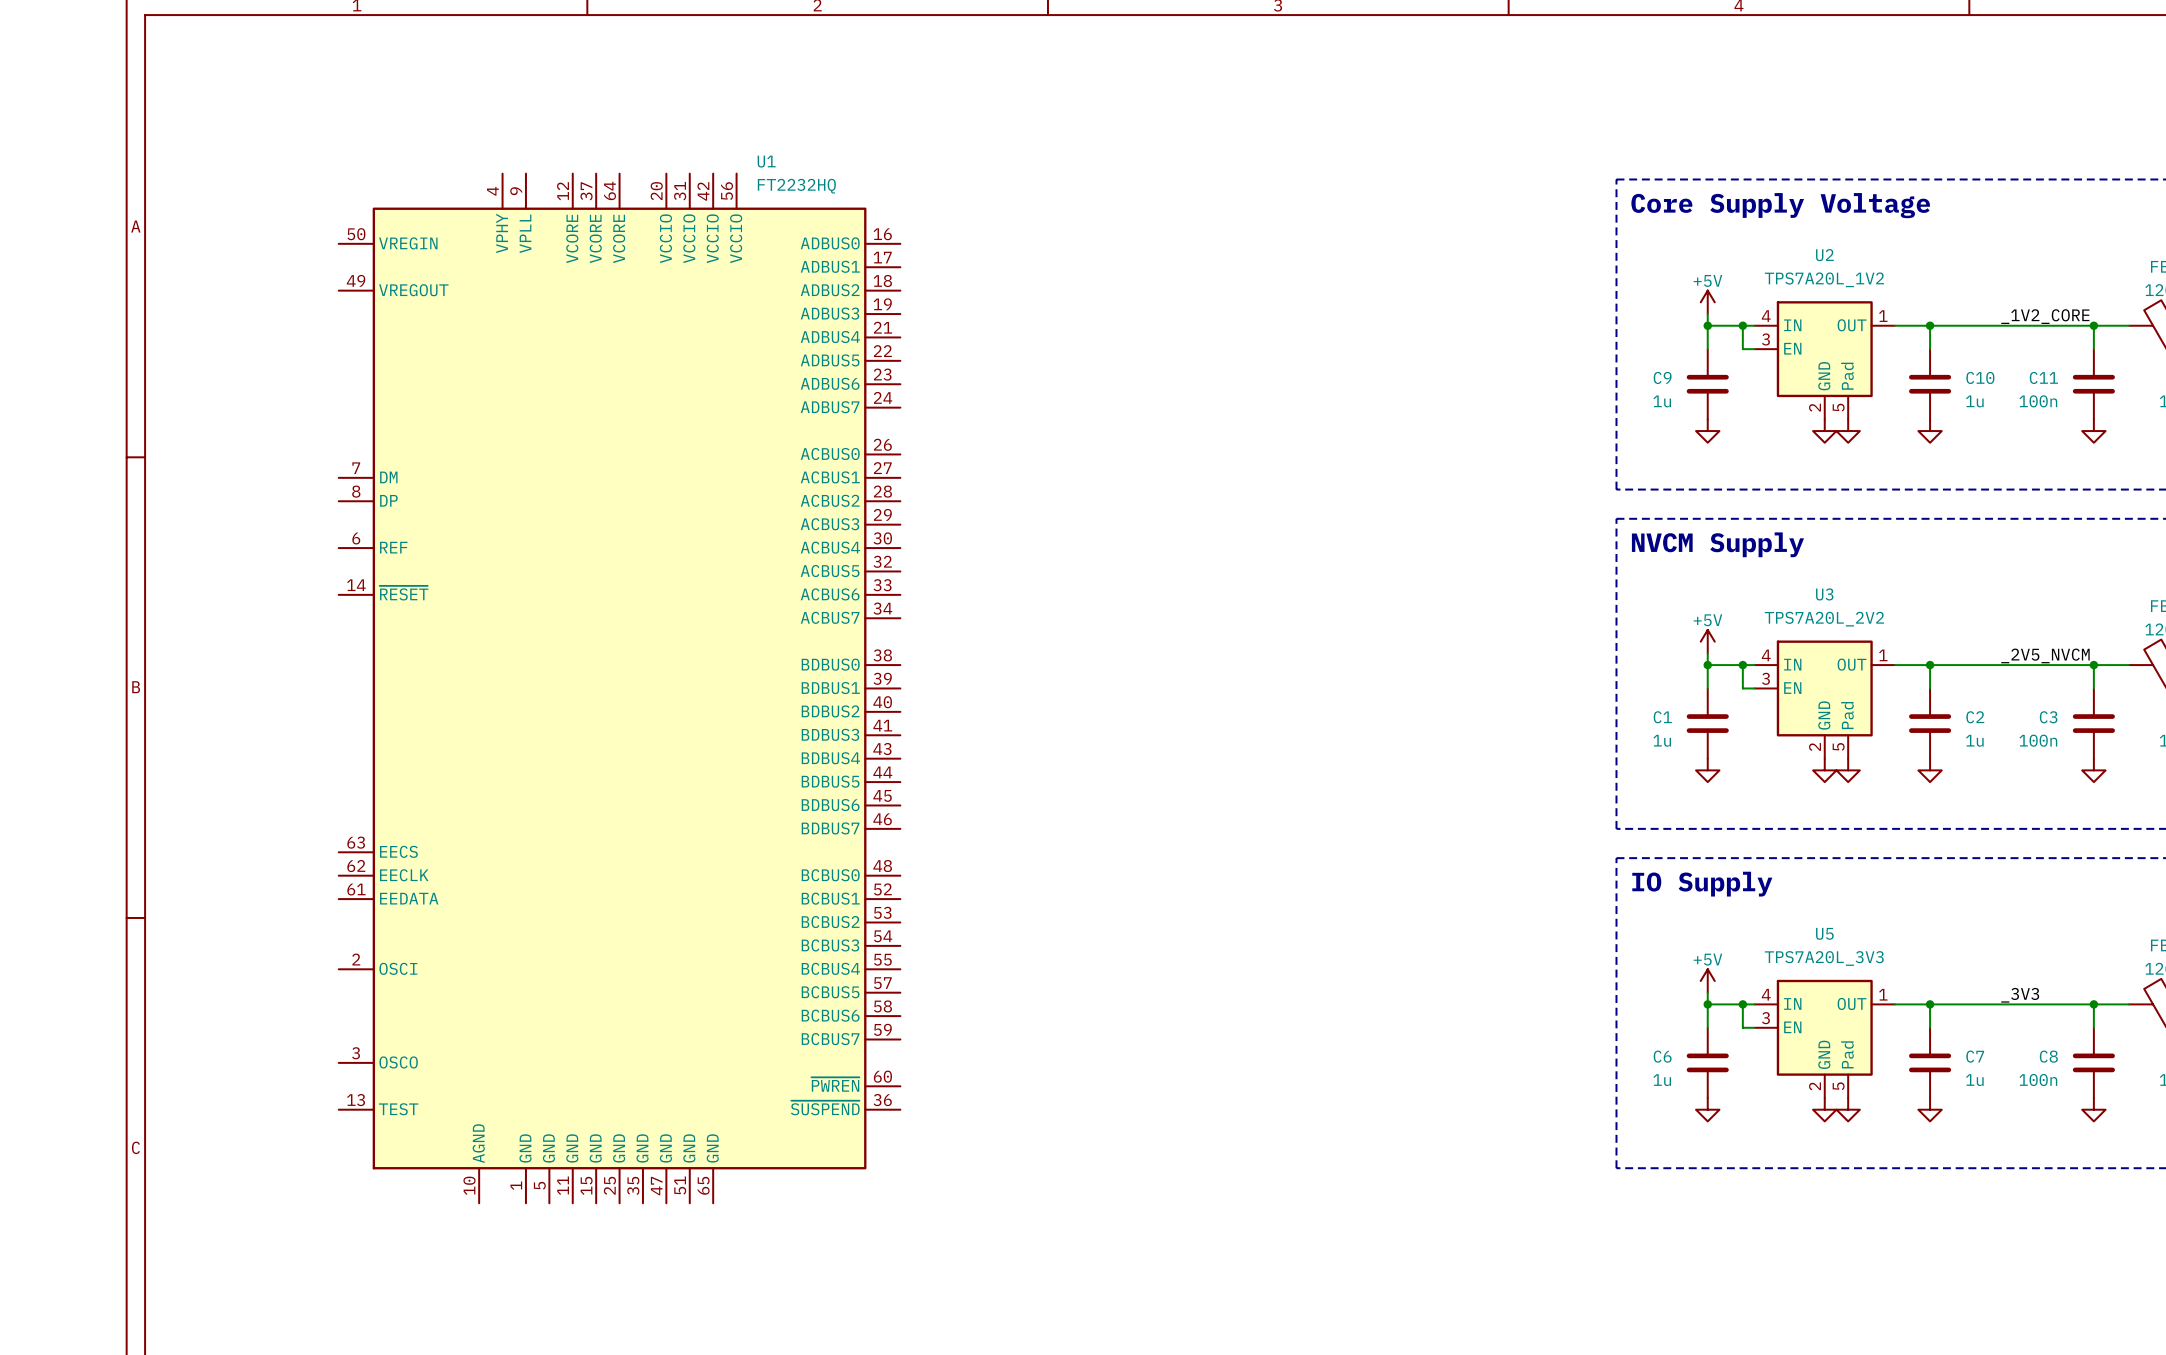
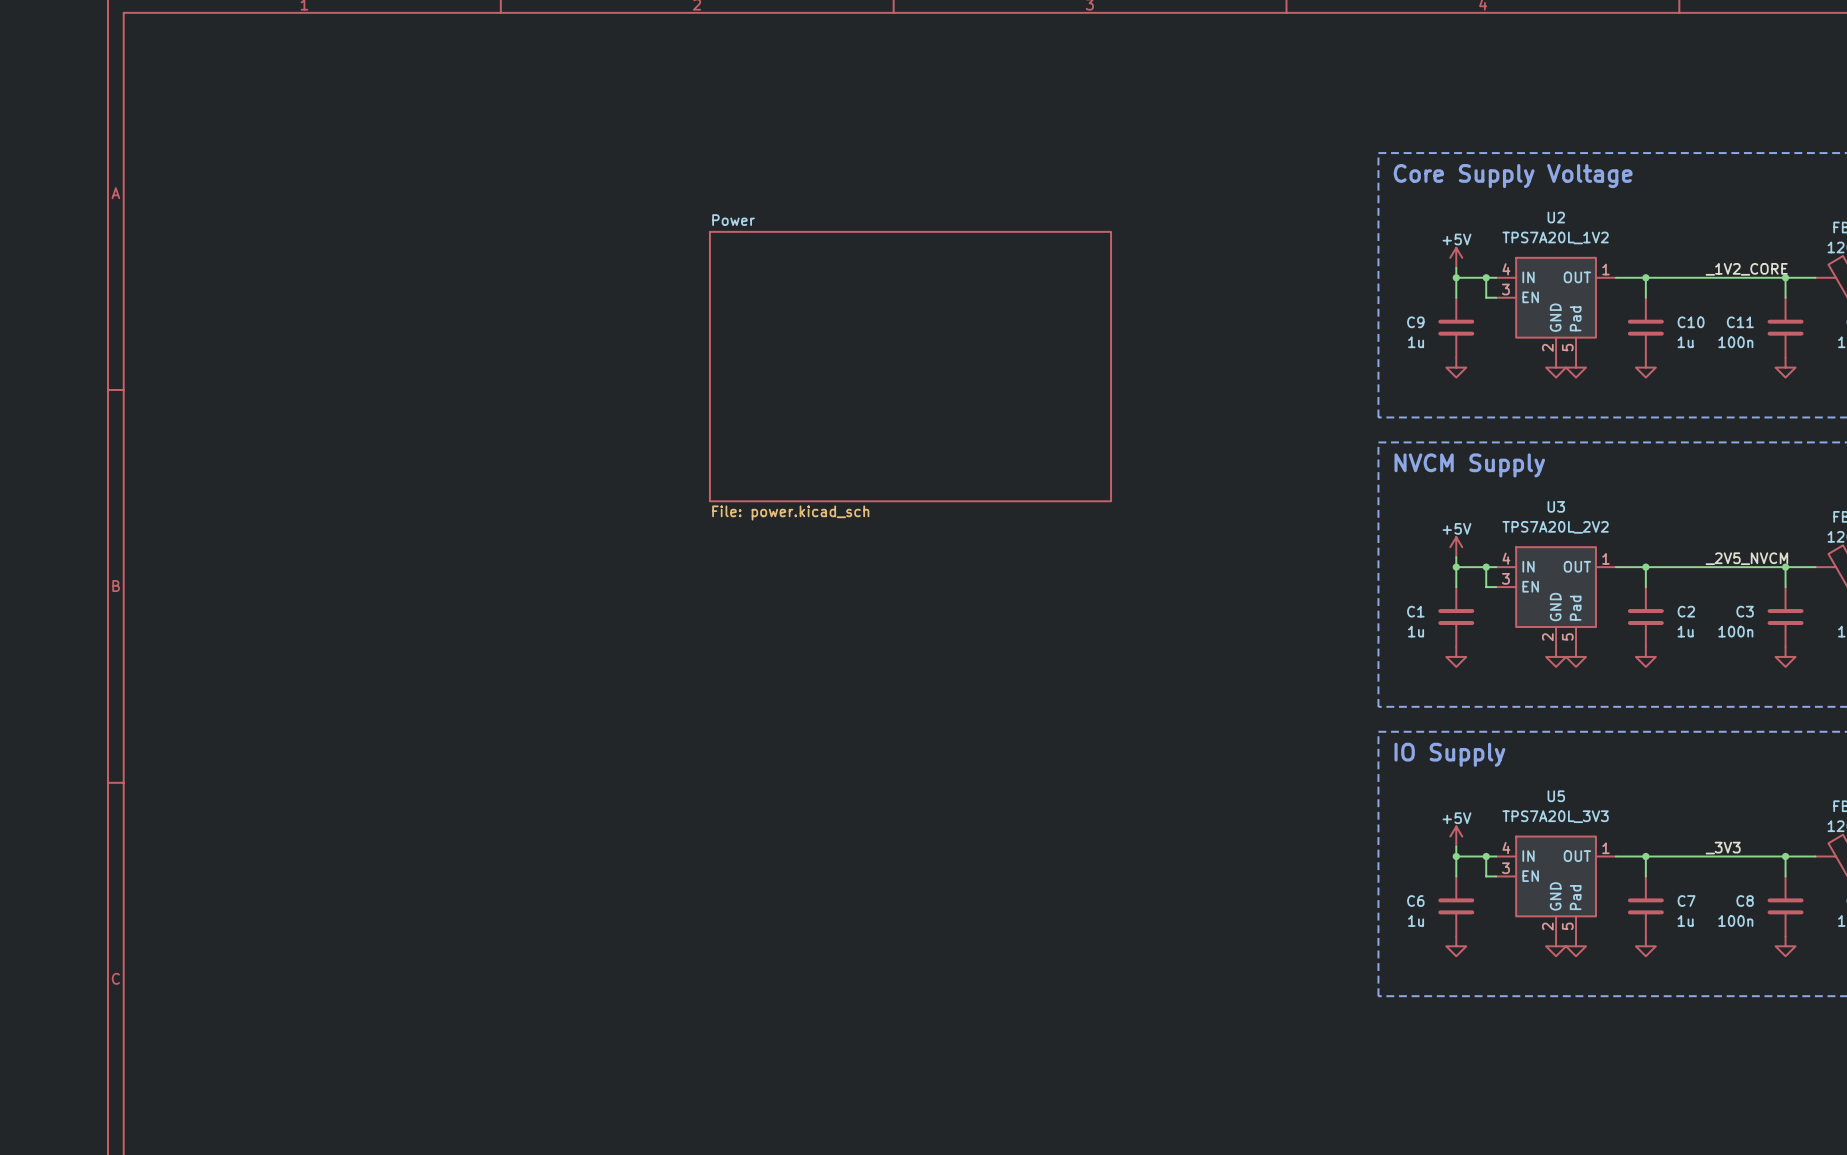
sheet Power: none -> File: power.kicad_sch (910, 366)
U1: FT2232HQ (619, 688) -> none

